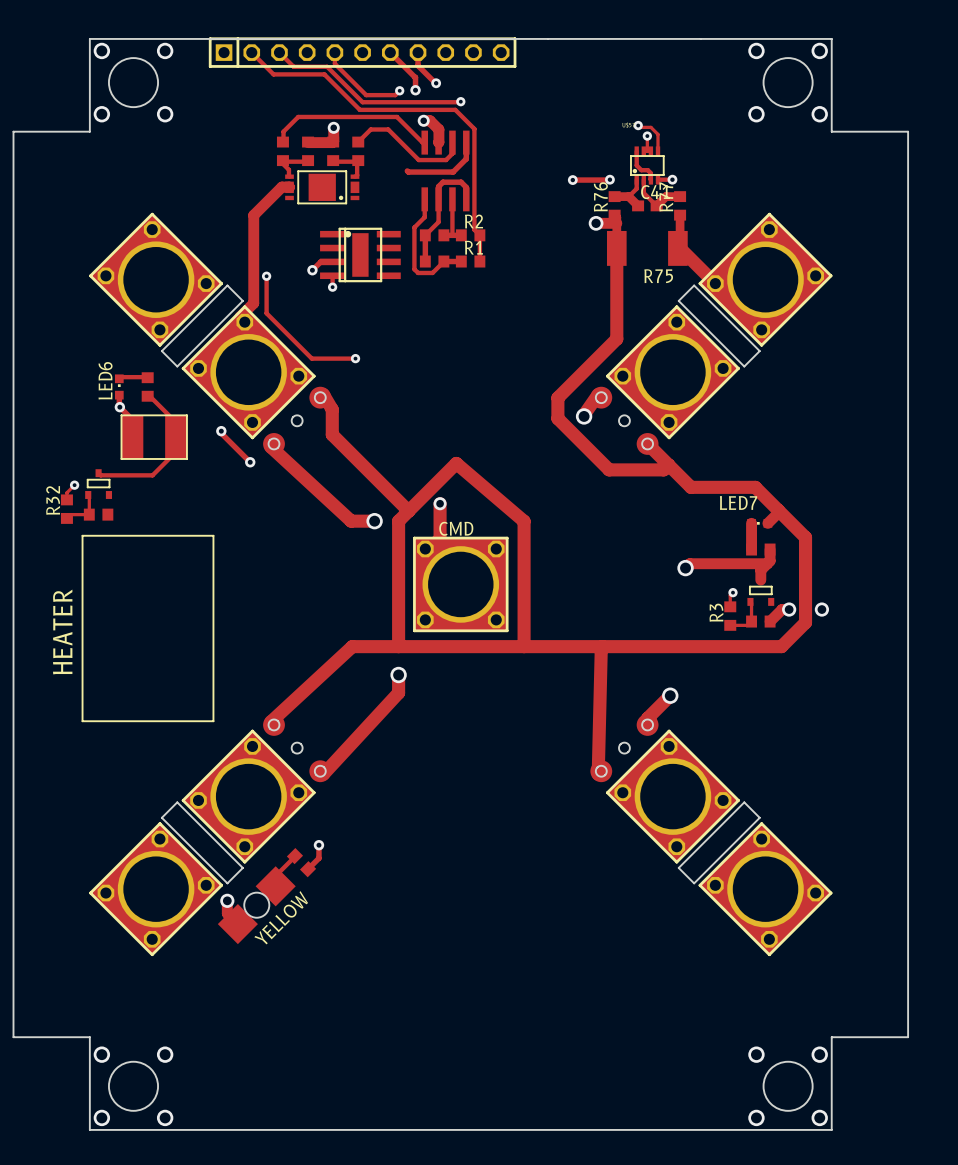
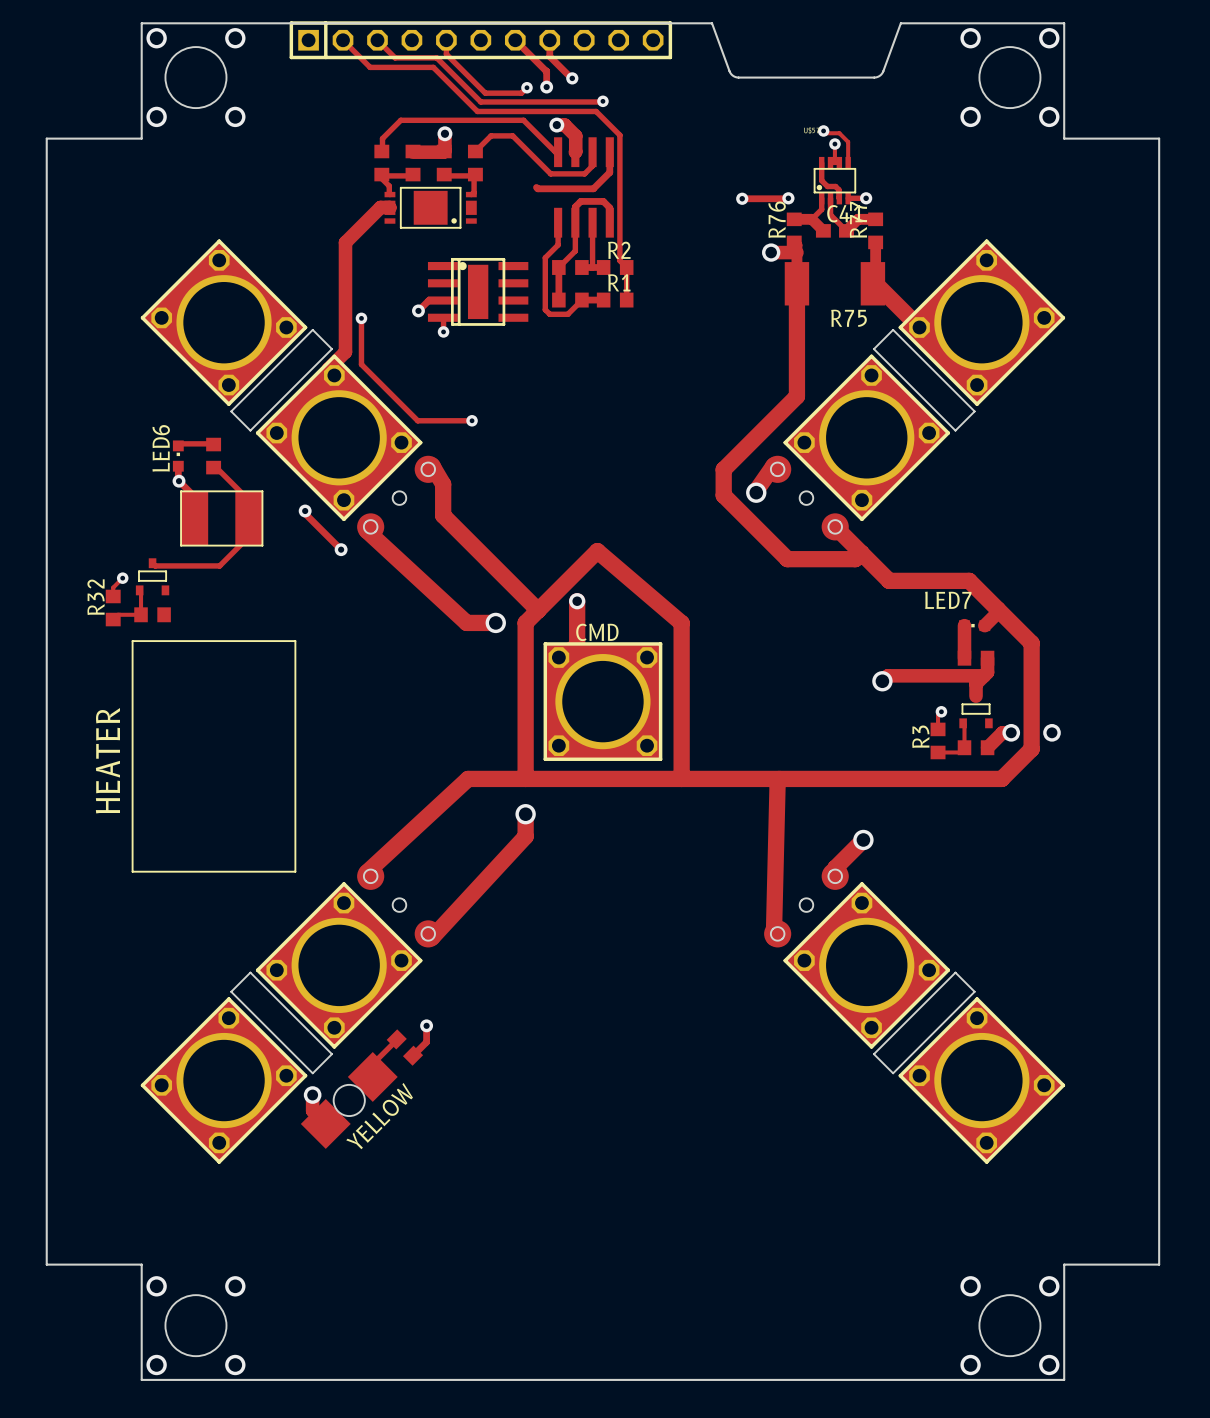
board edge: (548, 38) (700, 38) -> (712, 23) (729, 72) (738, 77) (877, 76) (883, 71) (900, 23)

